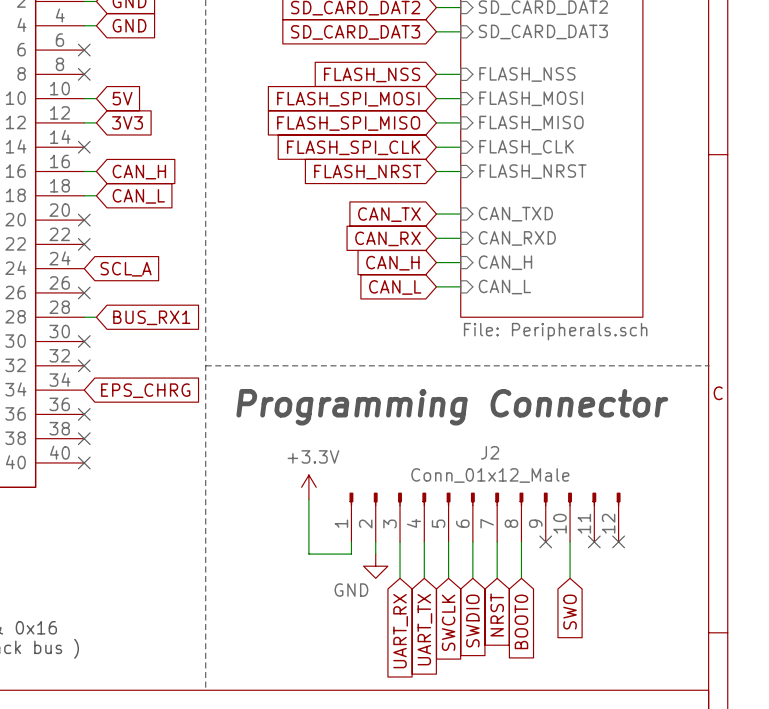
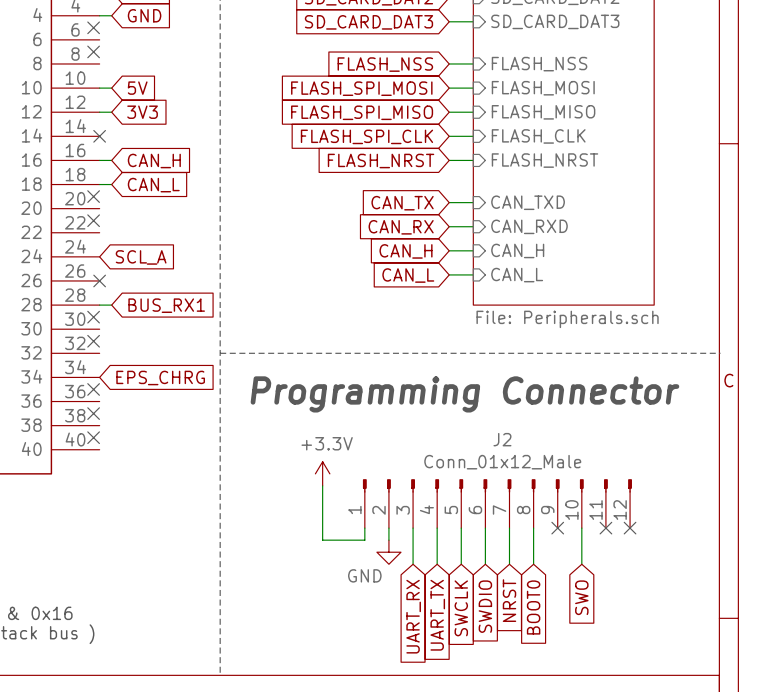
no-connect mark: none -> (93, 27)
no-connect mark: (84, 50) -> none
no-connect mark: none -> (93, 51)
no-connect mark: (84, 74) -> none
no-connect mark: none -> (93, 196)
no-connect mark: (84, 220) -> none
no-connect mark: none -> (93, 220)
no-connect mark: (84, 244) -> none
no-connect mark: none -> (93, 317)
no-connect mark: (84, 341) -> none
no-connect mark: none -> (93, 341)
no-connect mark: (84, 365) -> none
no-connect mark: none -> (93, 389)
no-connect mark: (84, 414) -> none
no-connect mark: none -> (93, 413)
no-connect mark: (84, 438) -> none
no-connect mark: none -> (93, 437)
no-connect mark: (84, 462) -> none

